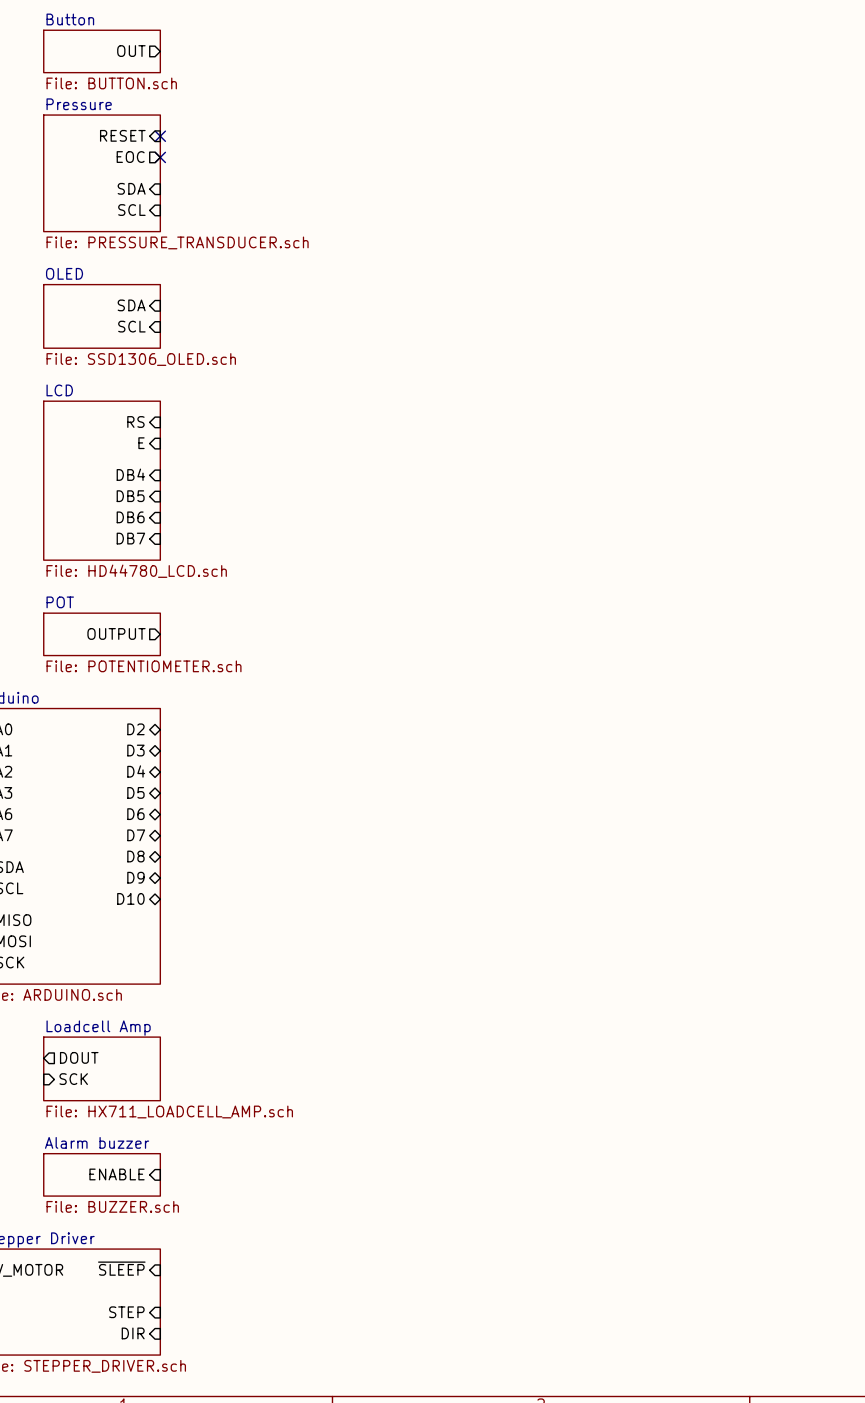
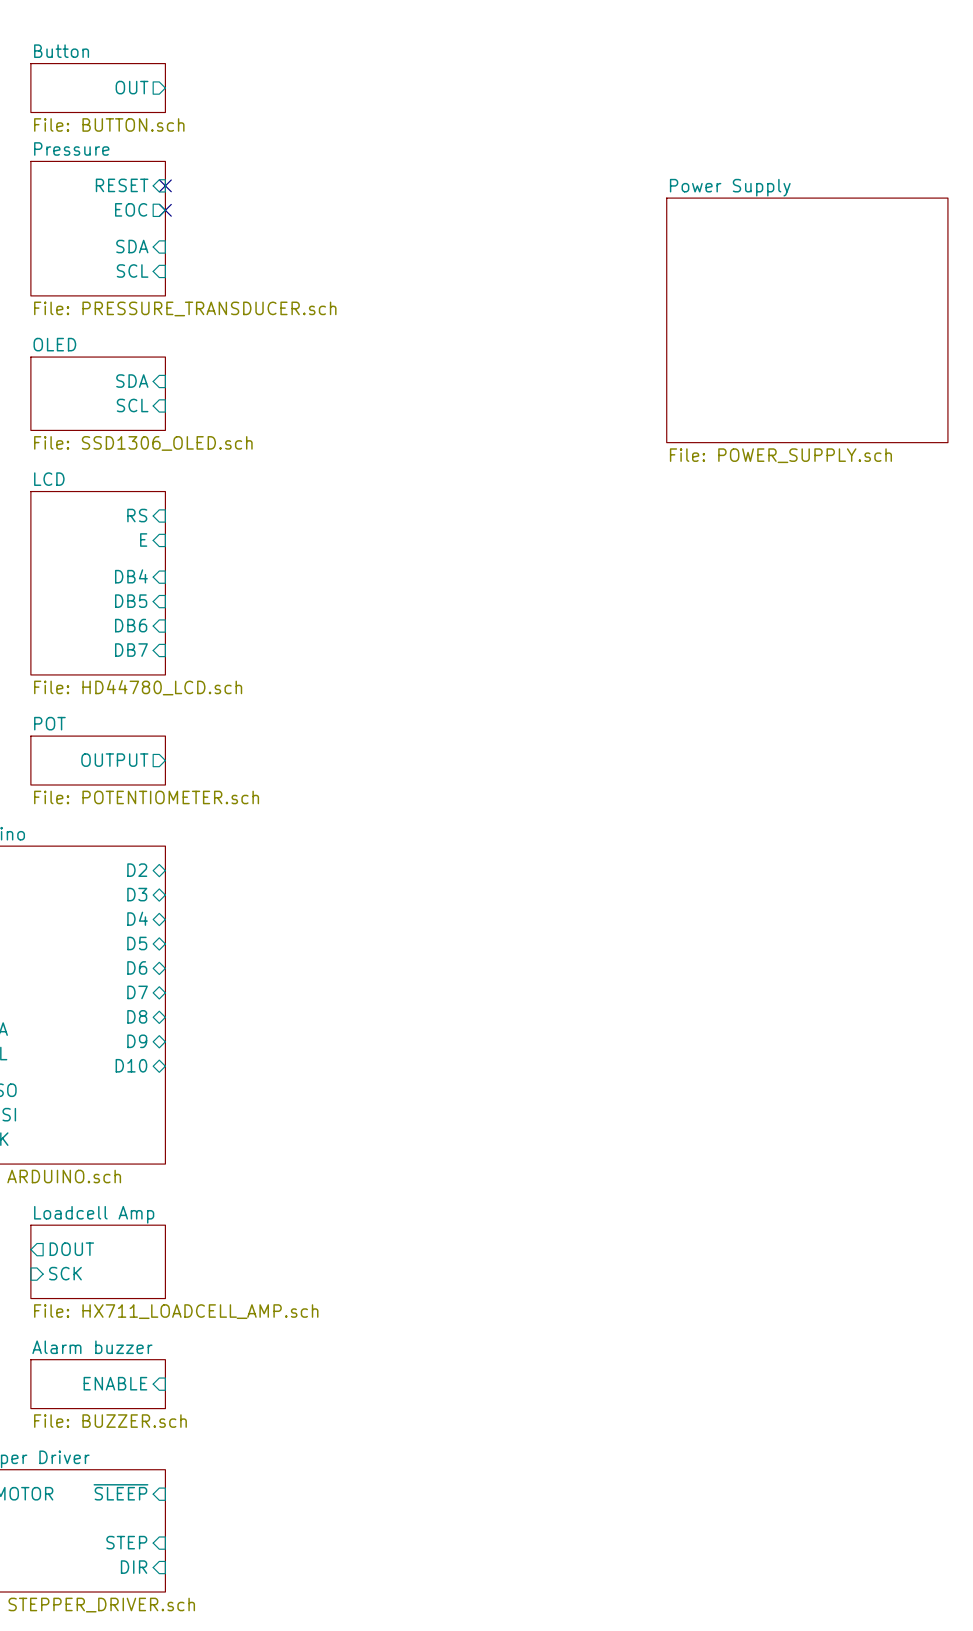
sheet Power Supply: none -> File: POWER_SUPPLY.sch (807, 320)

